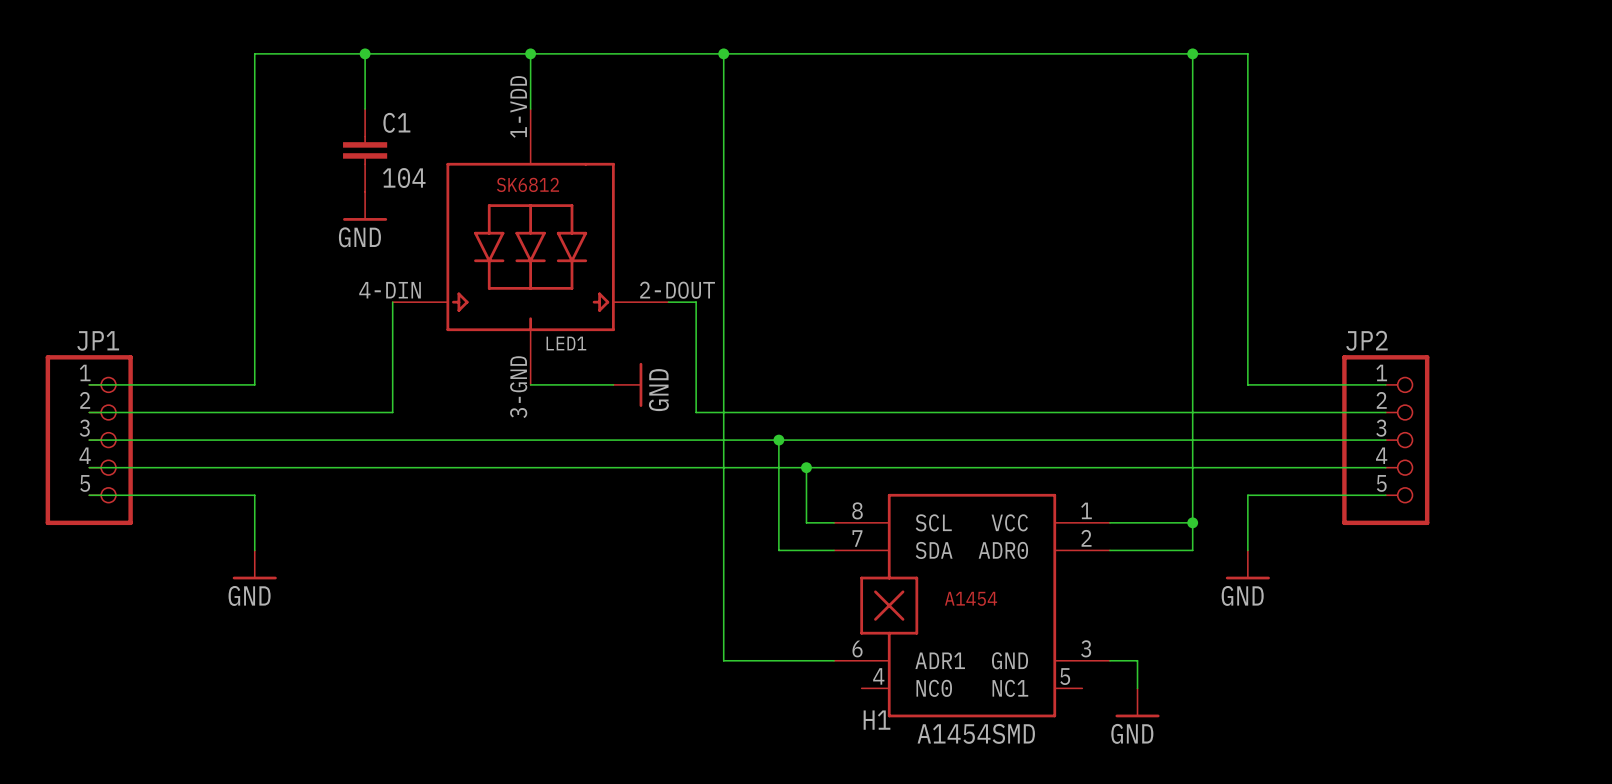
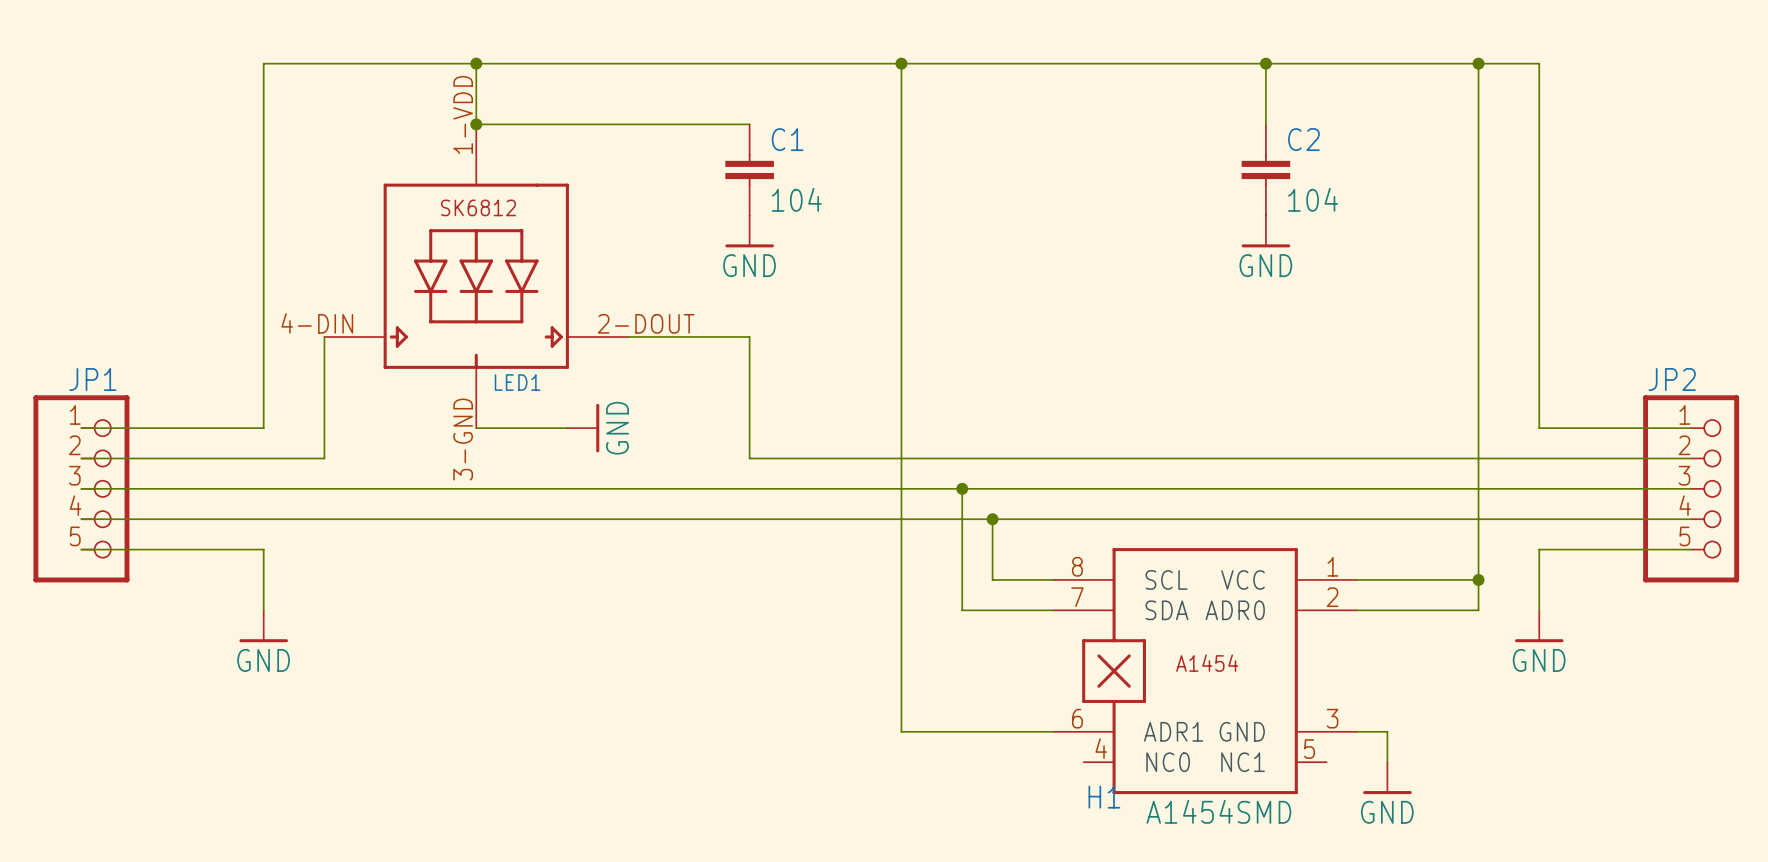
wire: (365, 53) (365, 109) -> none
junction: (365, 53) -> none
wire: none -> (476, 63) (476, 124) (749, 124)
junction: none -> (476, 63)
wire: (530, 53) (530, 109) -> none
junction: (530, 53) -> none
wire: (723, 53) (723, 660) (834, 660) -> none
junction: (723, 53) -> none
wire: none -> (901, 63) (901, 731) (1053, 731)
junction: none -> (901, 63)
wire: none -> (1265, 63) (1265, 124)
wire: (1192, 53) (1192, 550) (1109, 550) -> none
junction position: (1192, 53) -> (1265, 63)
wire: (1247, 53) (1247, 384) (1385, 384) -> (1357, 63) (1539, 63) (1539, 428) (1691, 428)
junction: none -> (1478, 63)
junction: none -> (476, 124)
C1 position: (365, 150) -> (749, 169)
C2: none -> 104 (1265, 169)
power symbol: GND (365, 206) -> none
power symbol: none -> GND (749, 231)
power symbol: none -> GND (1265, 231)
LED1 position: (530, 246) -> (476, 276)
wire: (392, 302) (392, 412) (309, 412) -> (324, 337) (324, 458)
wire: (530, 384) (613, 384) -> (567, 428) (476, 428)
power symbol position: GND (627, 384) -> GND (583, 428)
wire: none -> (1508, 458) (1691, 458)
wire: (778, 440) (778, 550) (834, 550) -> none
junction: (778, 440) -> none
wire: none -> (962, 488) (962, 610) (1053, 610)
junction: none -> (962, 488)
wire: none -> (1508, 488) (1691, 488)
JP2 position: (1385, 440) -> (1691, 488)
wire: (806, 467) (806, 522) (834, 522) -> none
junction: (806, 467) -> none
wire: none -> (992, 519) (992, 579) (1053, 579)
junction: none -> (992, 519)
wire: none -> (1508, 519) (1691, 519)
wire: (1385, 495) (1247, 495) (1247, 550) -> (1478, 63) (1478, 610) (1357, 610)
wire: none -> (1691, 549) (1539, 549) (1539, 610)
wire: (1109, 522) (1192, 522) -> none
junction: (1192, 522) -> none
wire: none -> (1357, 579) (1478, 579)
junction: none -> (1478, 579)
power symbol: GND (1247, 564) -> none
power symbol: none -> GND (1539, 626)
H1 position: (972, 605) -> (1205, 671)
wire: (1109, 660) (1137, 660) (1137, 688) -> (1357, 731) (1387, 731) (1387, 762)
power symbol: GND (1137, 702) -> none
power symbol: none -> GND (1387, 778)

